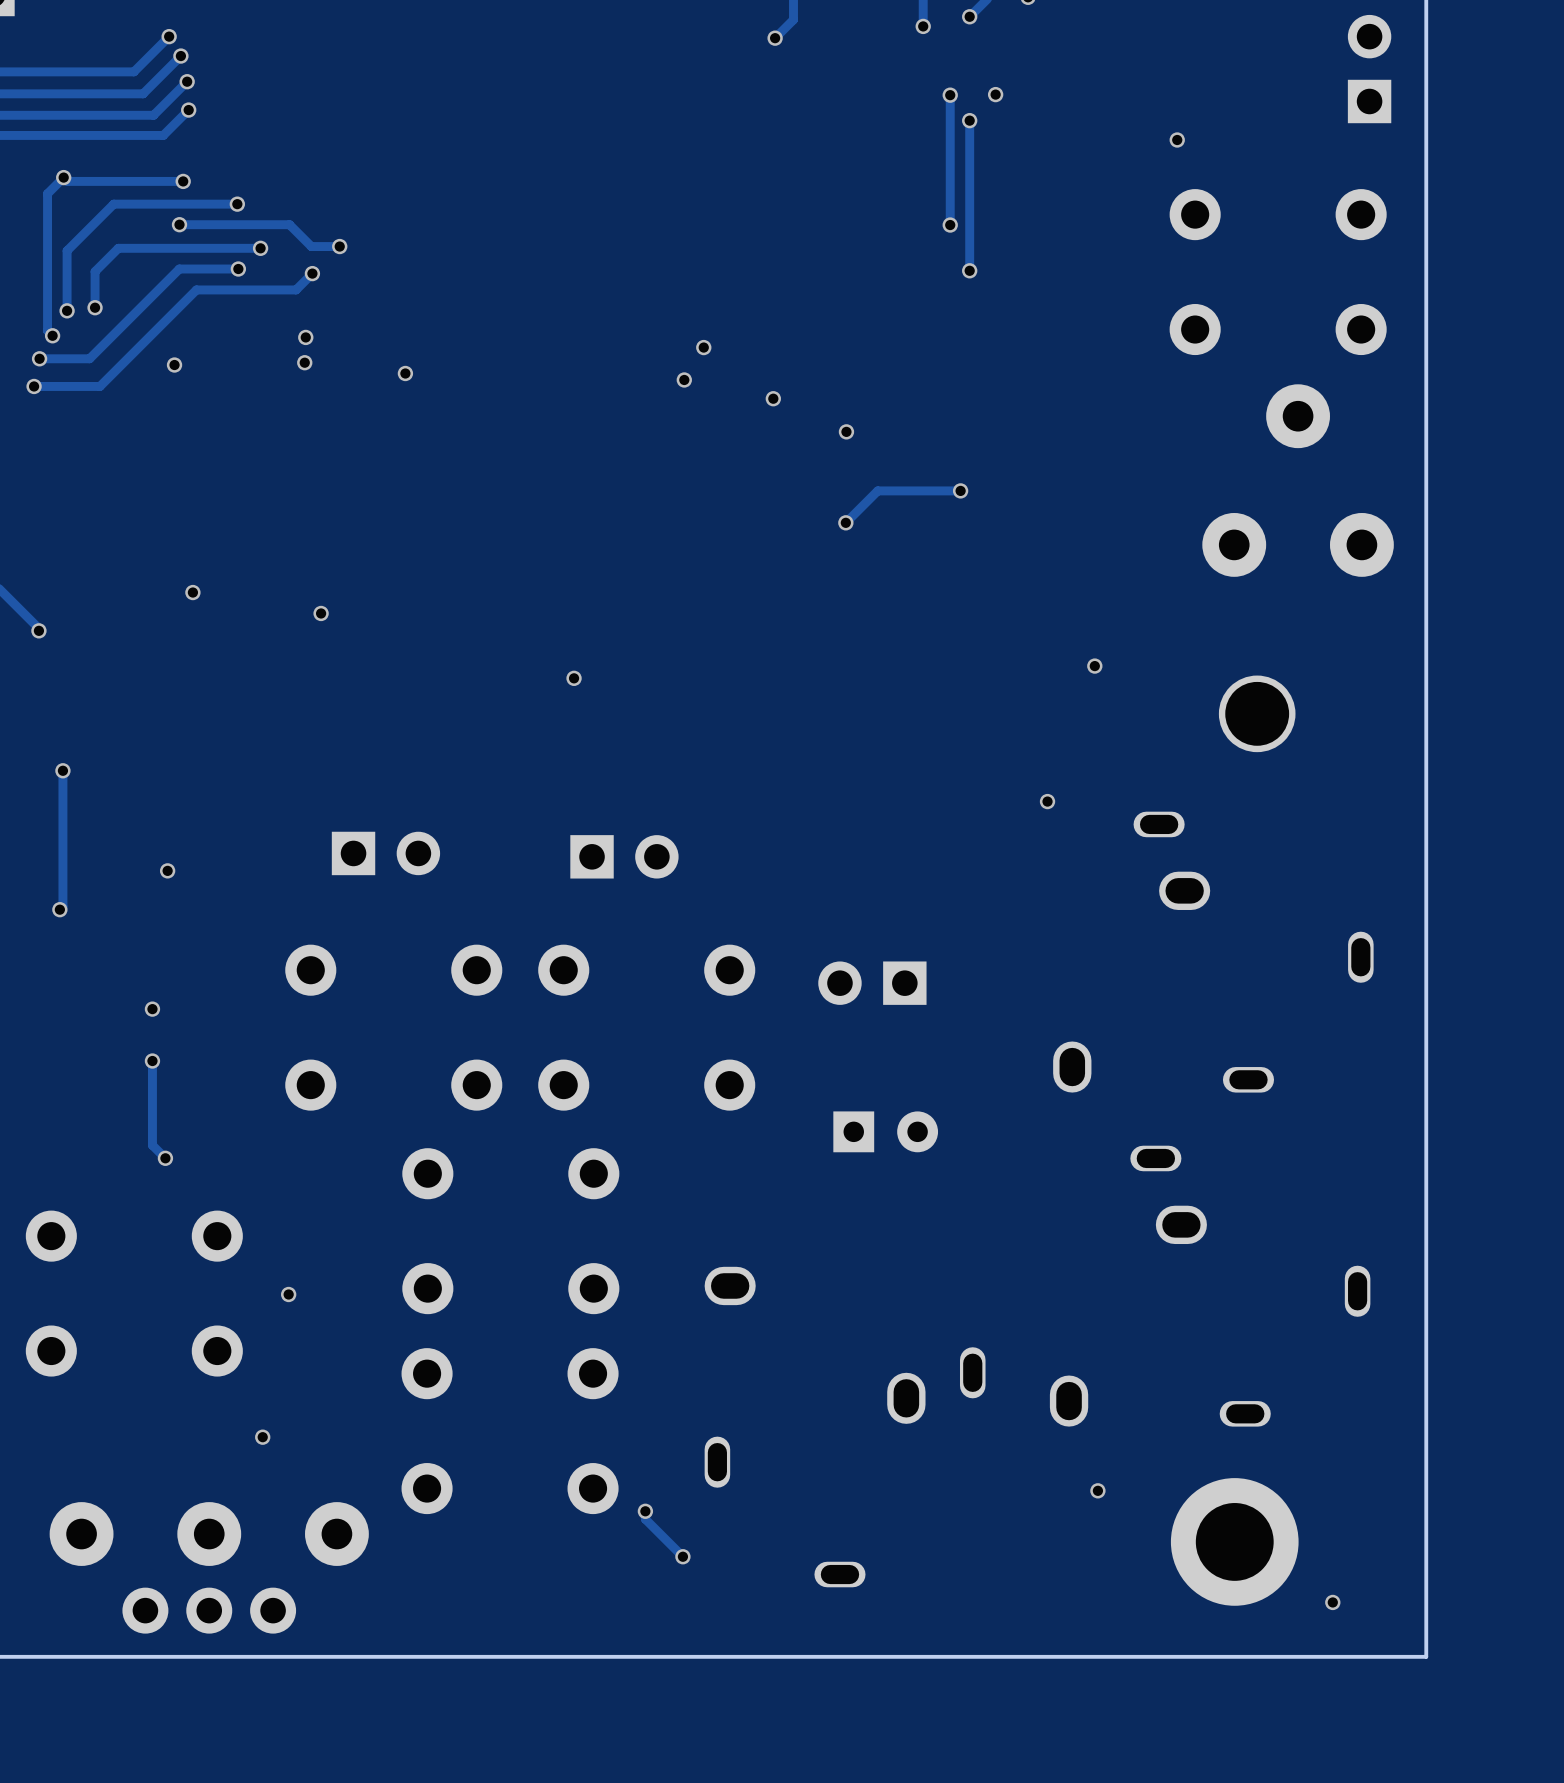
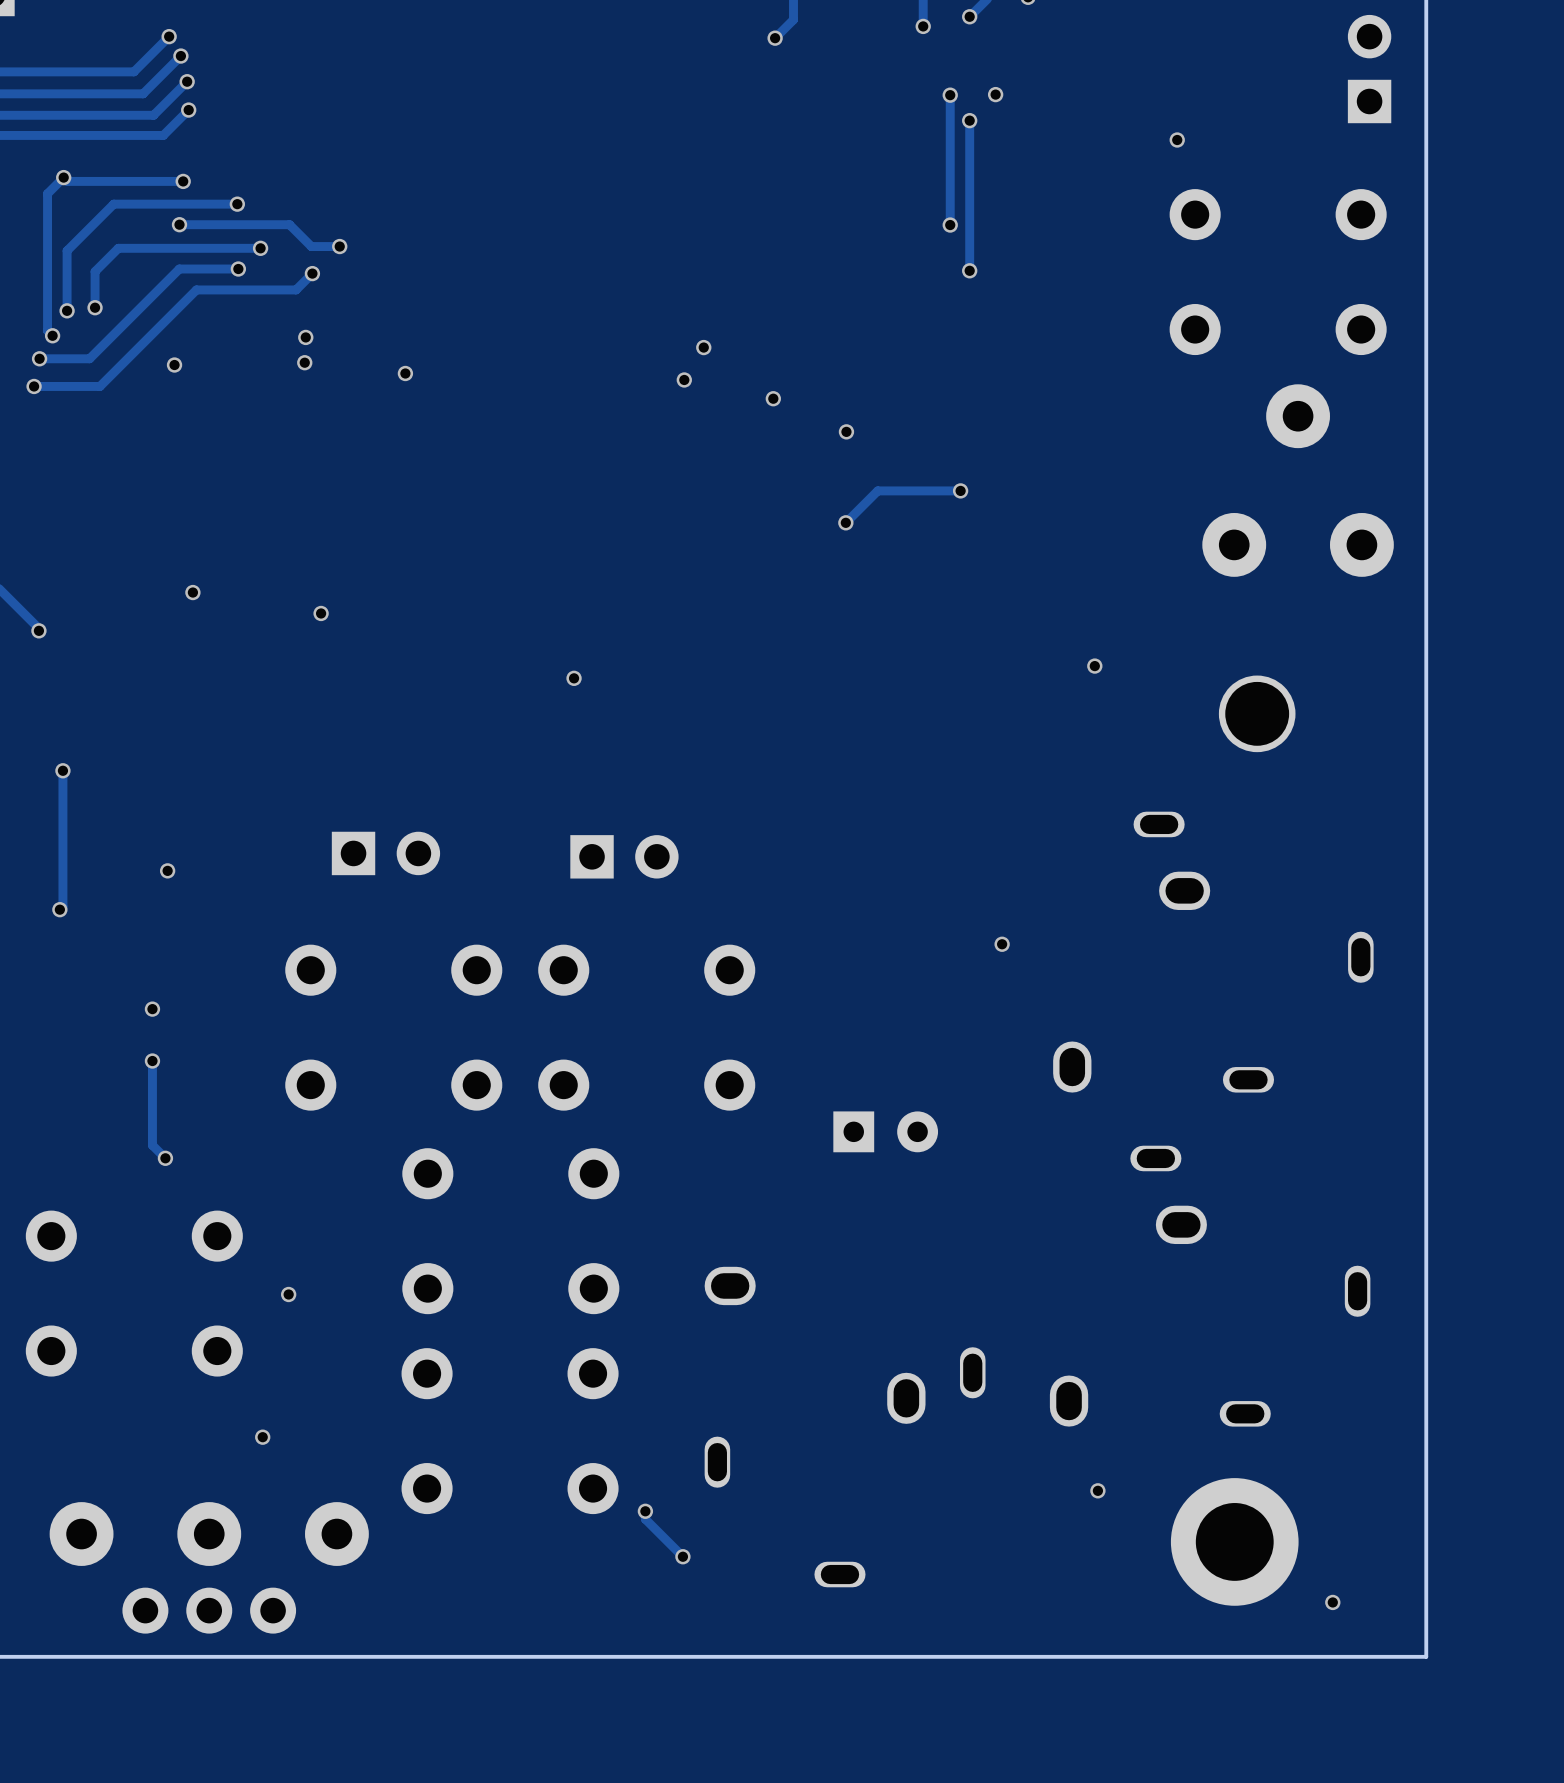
via position: (1047, 801) -> (1002, 944)
part: (872, 983) -> none

